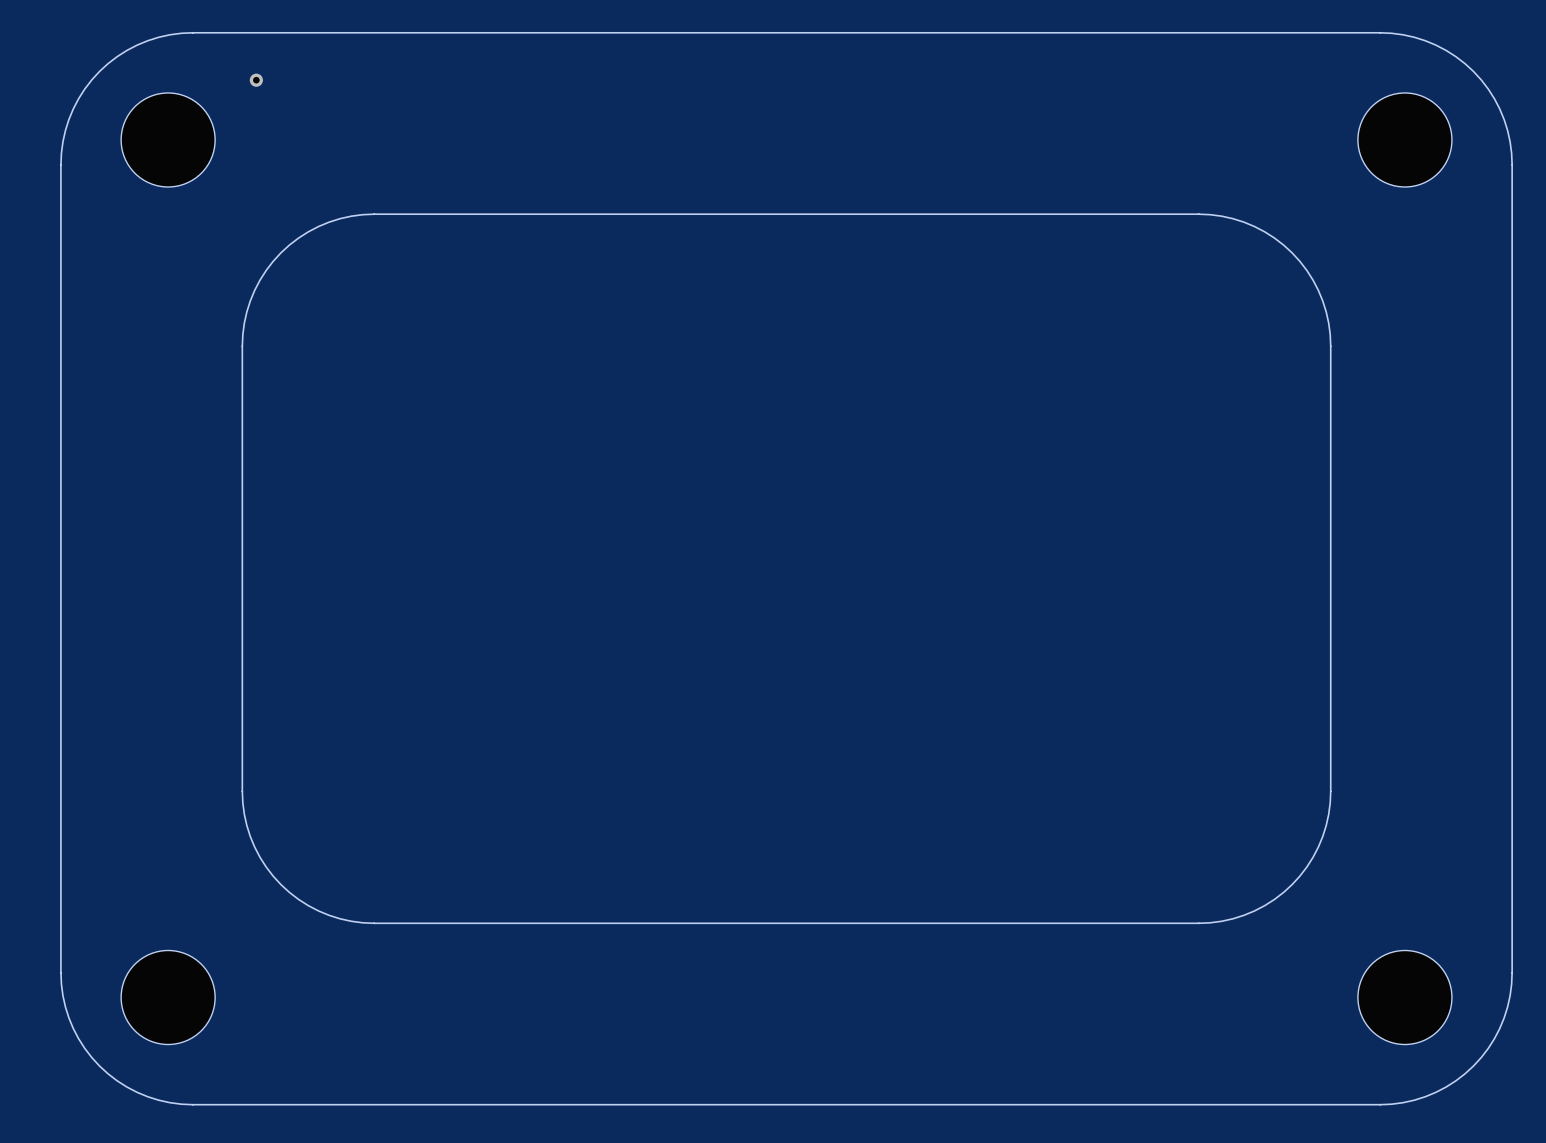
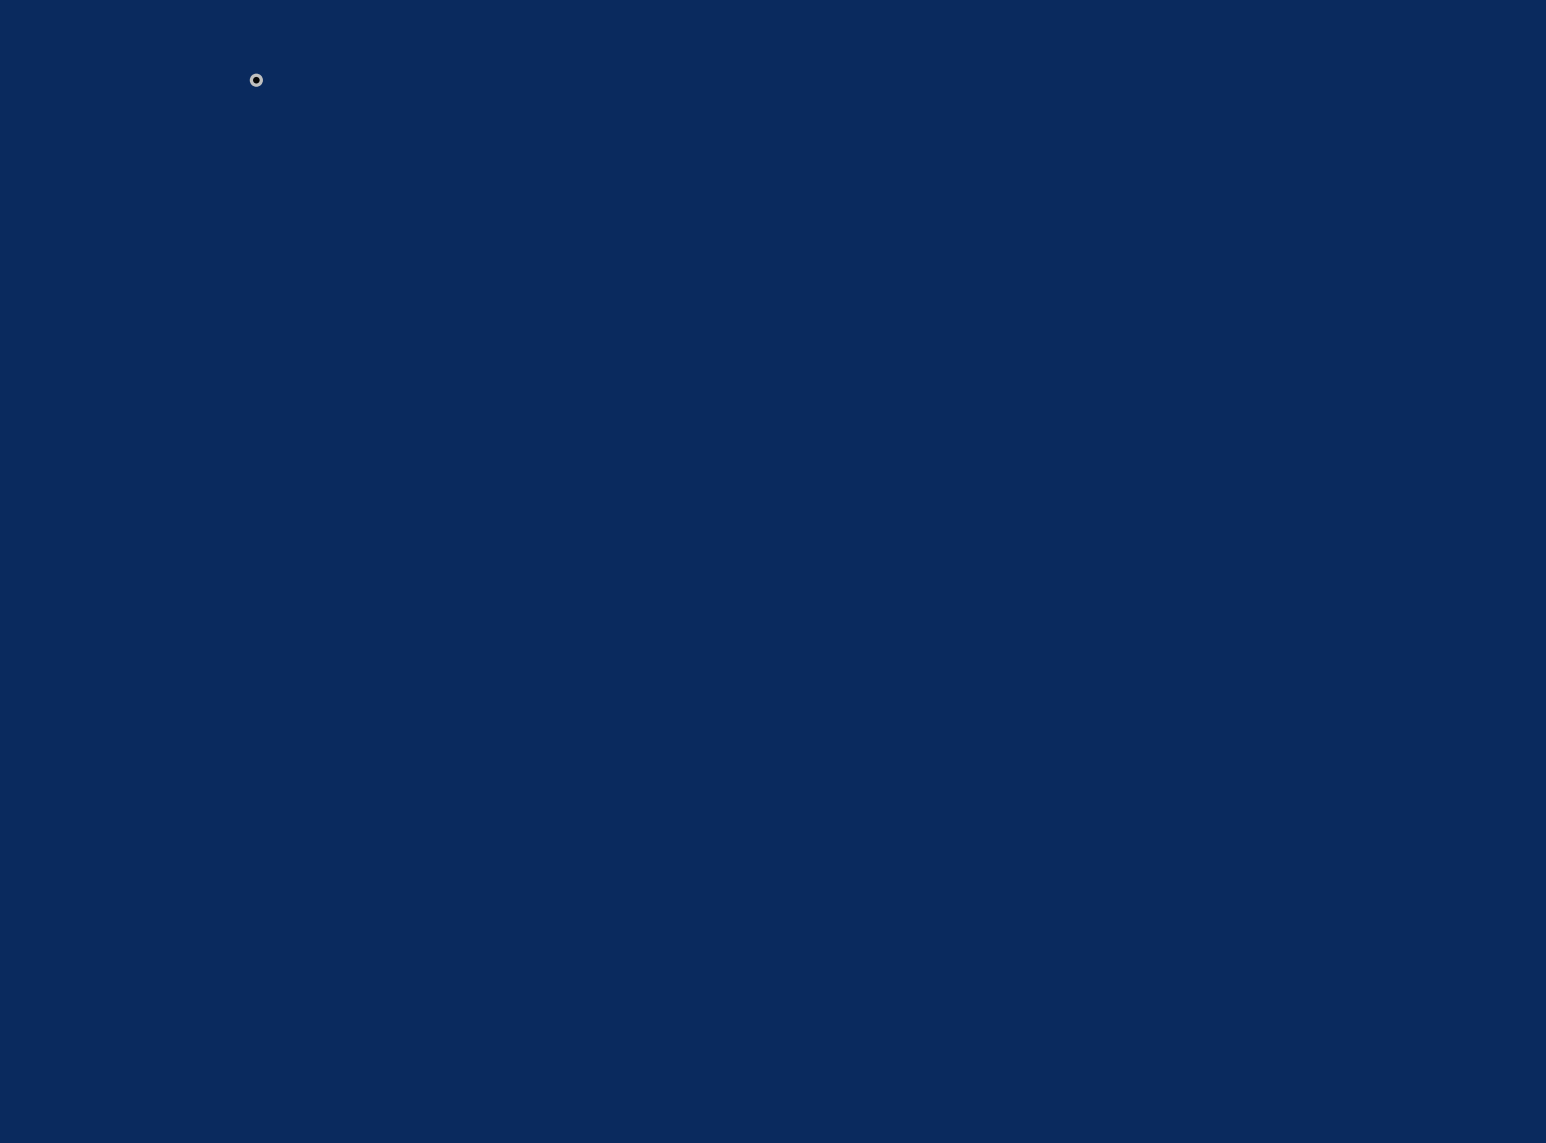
board edge: (1380, 32) (192, 32) (169, 34) (147, 40) (126, 50) (108, 63) (84, 89) (73, 108) (62, 141) (60, 164) (60, 972) (62, 995) (68, 1017) (78, 1038) (91, 1057) (117, 1080) (137, 1092) (169, 1102) (192, 1104) (1380, 1104) (1403, 1102) (1425, 1096) (1446, 1087) (1465, 1073) (1481, 1057) (1494, 1038) (1507, 1006) (1511, 984) (1511, 153) (1504, 119) (1494, 98) (1481, 79) (1465, 63) (1446, 50) (1425, 40) (1403, 34) (1380, 32) -> none
part: (168, 139) -> none
part: (1404, 139) -> none
board edge: (1198, 214) (374, 214) (340, 218) (318, 226) (298, 238) (273, 261) (260, 280) (246, 311) (242, 334) (242, 802) (250, 836) (266, 867) (289, 892) (318, 910) (351, 921) (374, 923) (1198, 923) (1232, 918) (1254, 910) (1274, 899) (1292, 884) (1313, 857) (1326, 825) (1330, 802) (1330, 334) (1326, 311) (1318, 290) (1306, 270) (1292, 252) (1264, 231) (1243, 222) (1221, 216) (1198, 214) -> none
part: (168, 997) -> none
part: (1404, 997) -> none

